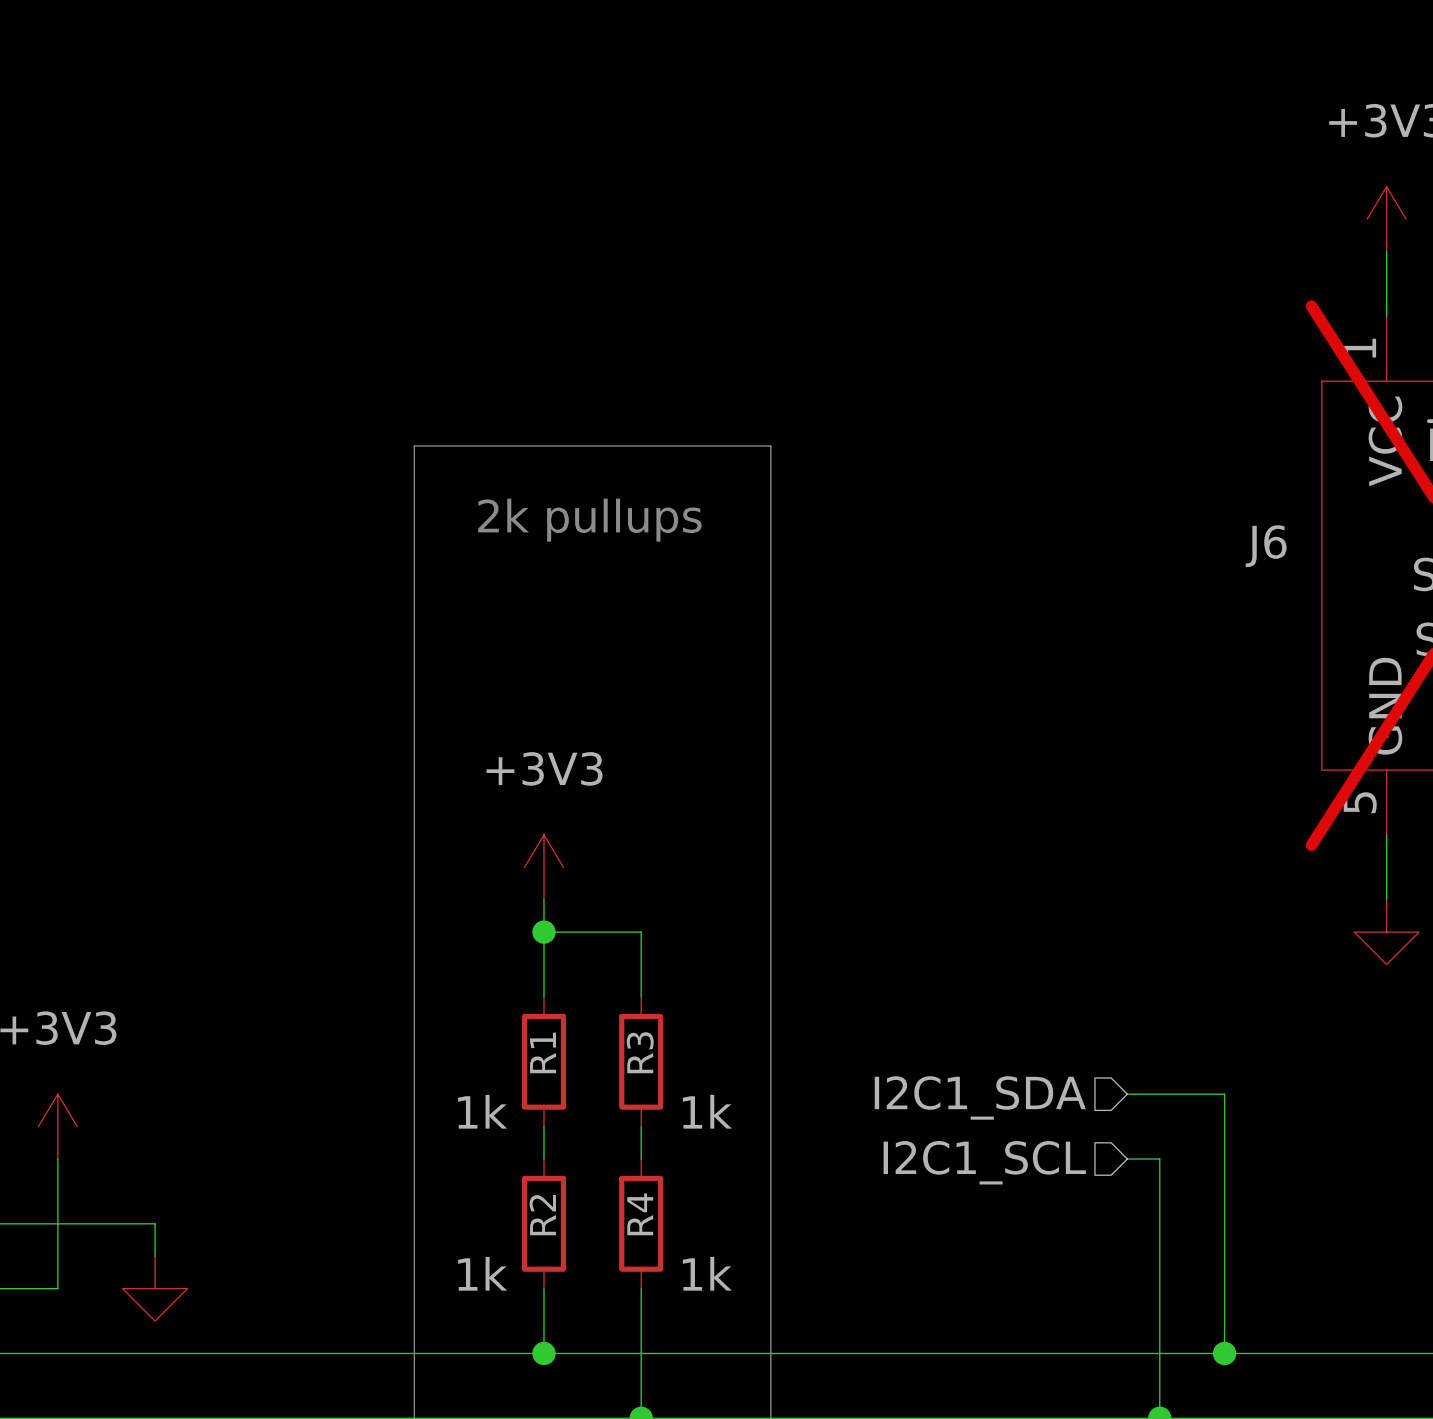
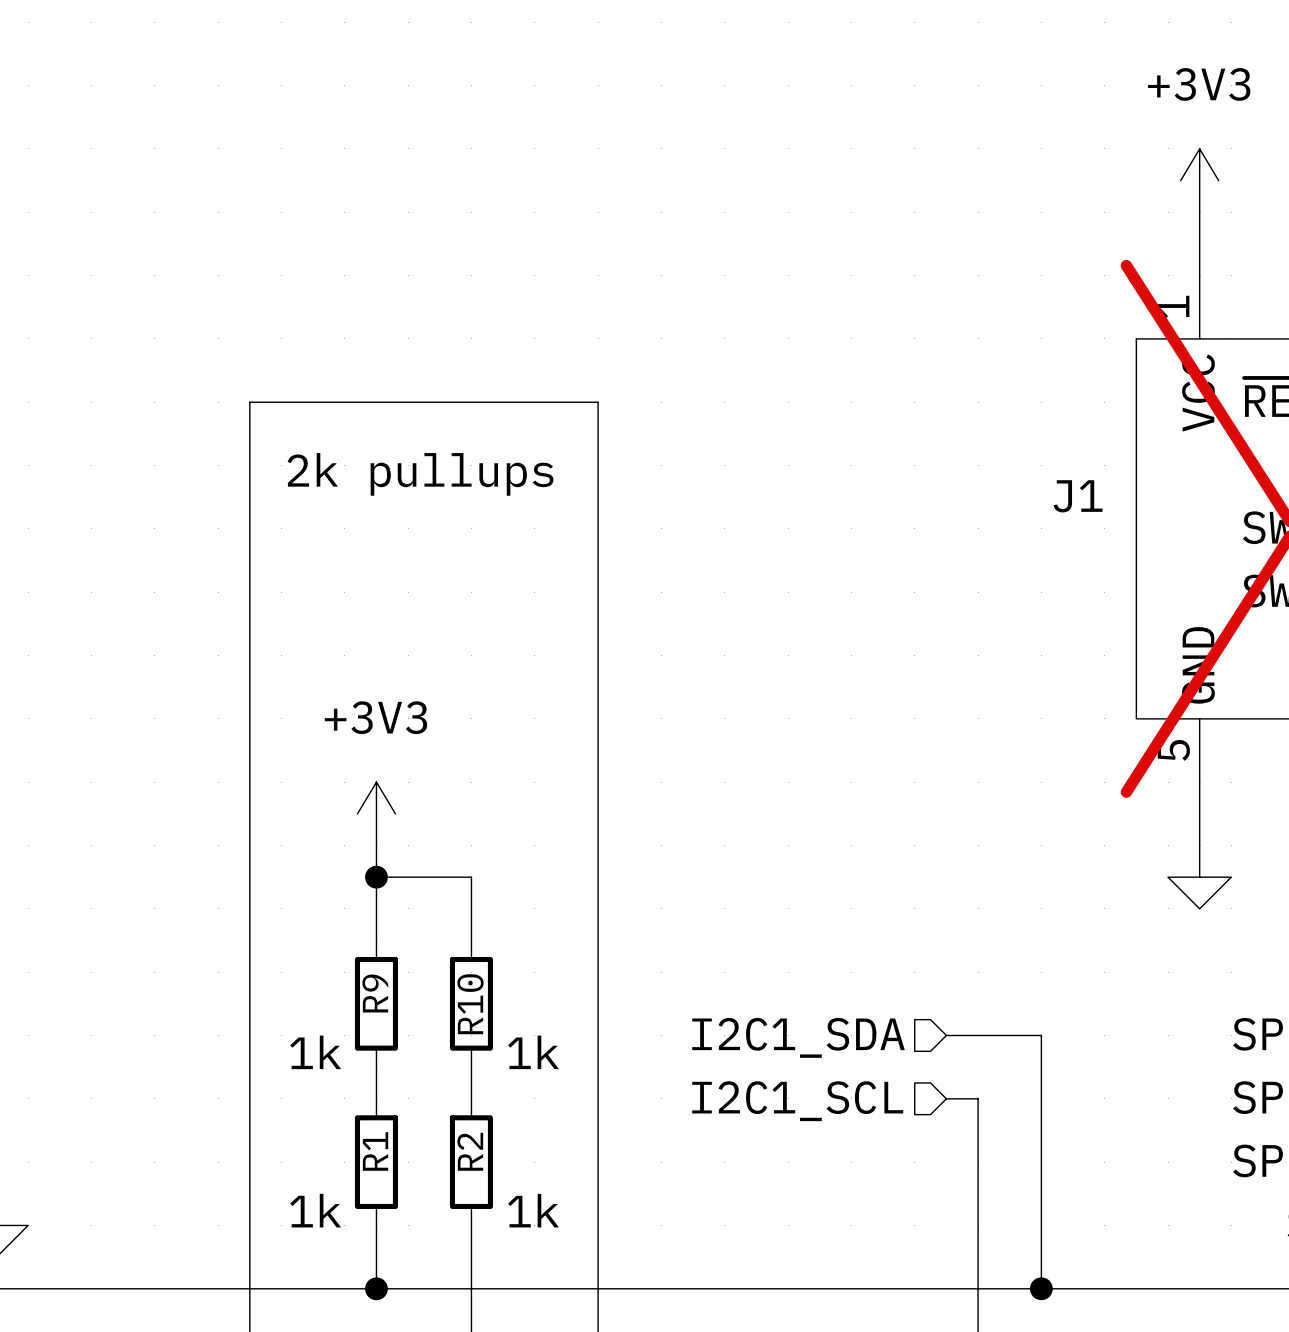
J6 name: J6 (1266, 546) -> J1 (1078, 496)
R1 name: R1 (543, 1052) -> R9 (375, 993)
R3 name: R3 (640, 1052) -> R10 (470, 1004)
R4 name: R4 (640, 1214) -> R2 (470, 1151)
R2 name: R2 (542, 1215) -> R1 (375, 1151)

